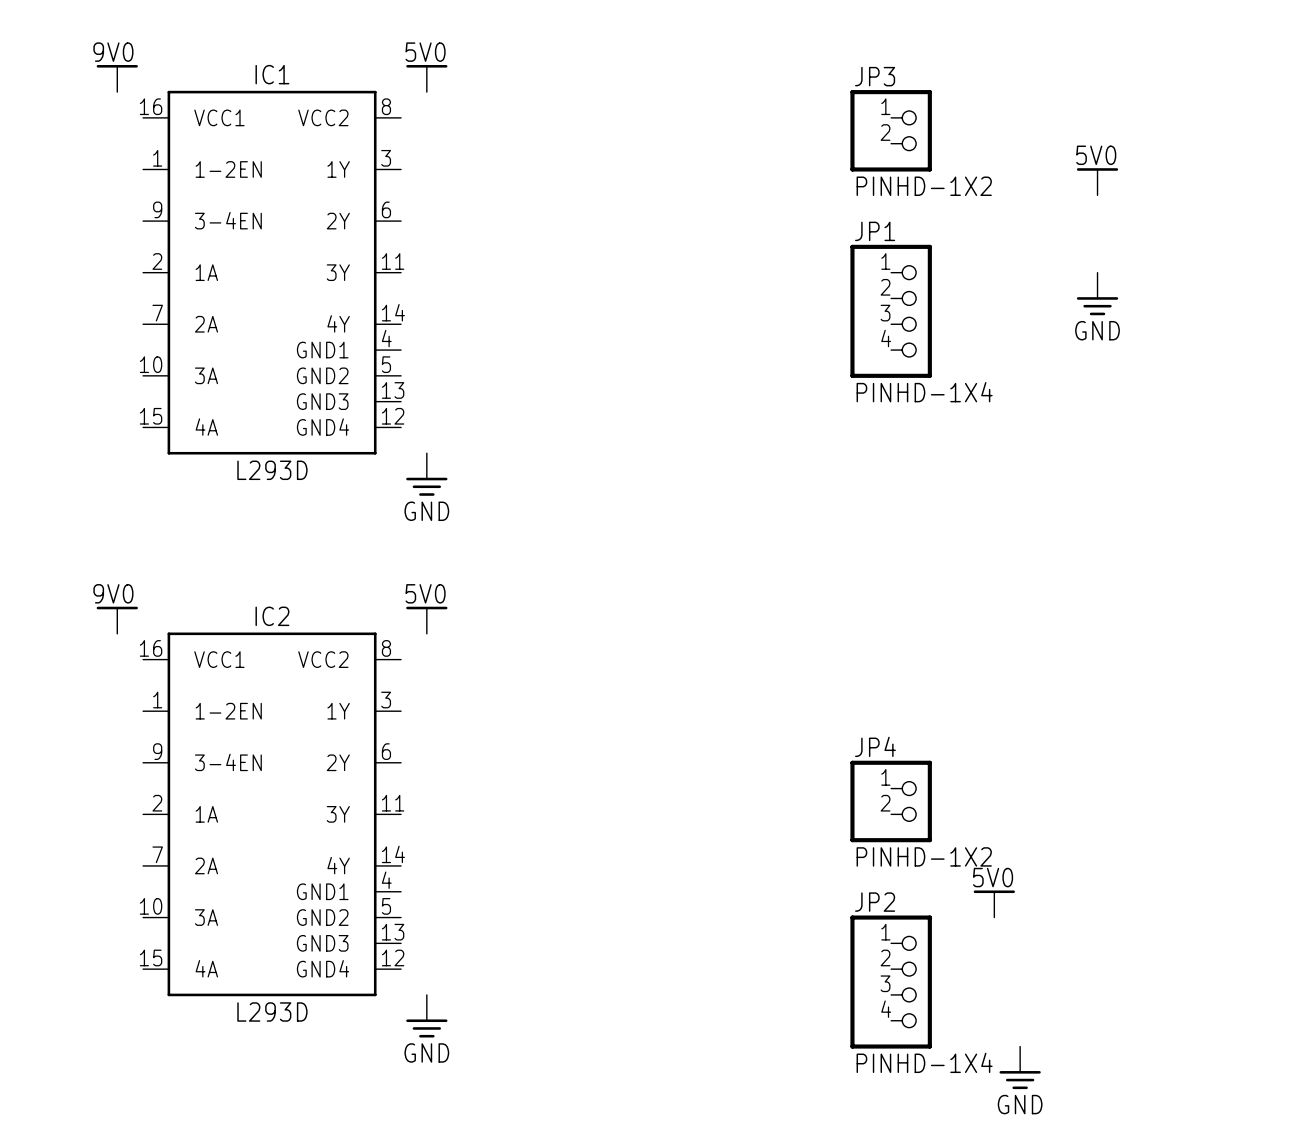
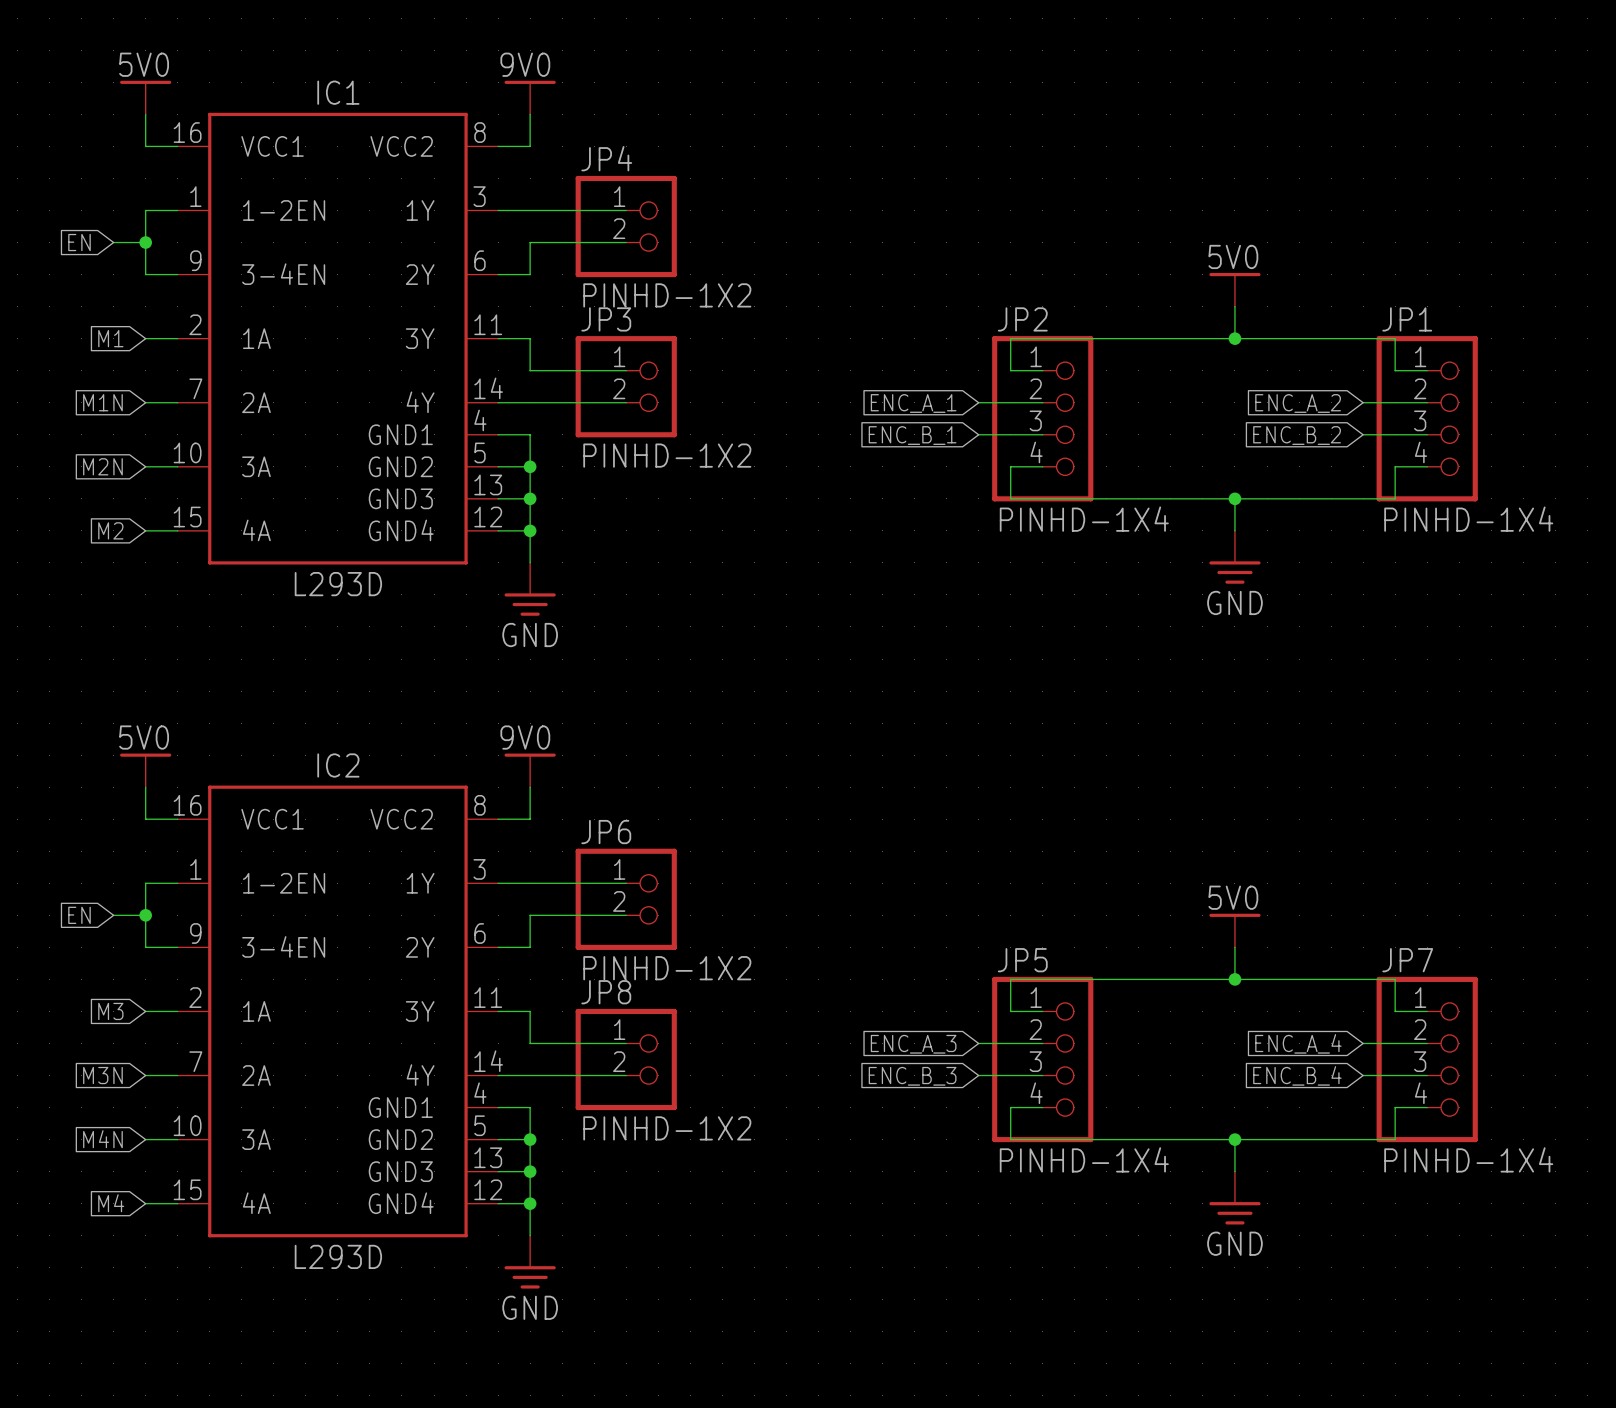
power symbol: 9V0 (117, 78) -> 5V0 (145, 97)
power symbol: 5V0 (426, 78) -> 9V0 (530, 97)
wire: none -> (145, 114) (145, 146) (177, 146)
wire: none -> (530, 114) (530, 146) (498, 146)
JP3 position: (891, 130) -> (626, 386)
wire: none -> (177, 210) (145, 210) (145, 274) (177, 274)
wire: none -> (498, 210) (626, 210)
power symbol position: 5V0 (1097, 181) -> 5V0 (1234, 289)
global label: none -> EN (79, 242)
wire: none -> (113, 242) (145, 242)
junction: none -> (145, 242)
wire: none -> (626, 242) (530, 242) (530, 274) (498, 274)
wire: none -> (1234, 306) (1234, 338)
global label: none -> M1 (110, 338)
wire: none -> (145, 338) (177, 338)
wire: none -> (498, 338) (530, 338) (530, 370) (626, 370)
junction: none -> (1234, 338)
power symbol position: GND (1097, 293) -> GND (1234, 557)
wire: none -> (1042, 370) (1010, 370) (1010, 338) (1395, 338) (1395, 370) (1427, 370)
JP1 position: (891, 311) -> (1427, 418)
global label: none -> M1N (102, 402)
wire: none -> (145, 402) (177, 402)
wire: none -> (498, 402) (626, 402)
global label: none -> ENC_A_1 (913, 403)
wire: none -> (978, 402) (1042, 402)
global label: none -> ENC_A_2 (1298, 403)
wire: none -> (1363, 402) (1427, 402)
wire: none -> (498, 434) (530, 434) (530, 562)
global label: none -> ENC_B_1 (912, 435)
wire: none -> (978, 434) (1042, 434)
global label: none -> ENC_B_2 (1297, 435)
wire: none -> (1363, 434) (1427, 434)
global label: none -> M2N (102, 466)
wire: none -> (145, 466) (177, 466)
wire: none -> (498, 466) (530, 466)
junction: none -> (530, 466)
wire: none -> (1042, 466) (1010, 466) (1010, 498) (1395, 498) (1395, 466) (1427, 466)
wire: none -> (498, 498) (530, 498)
junction: none -> (530, 498)
wire: none -> (1234, 498) (1234, 530)
junction: none -> (1234, 498)
global label: none -> M2 (110, 530)
wire: none -> (145, 530) (177, 530)
wire: none -> (498, 530) (530, 530)
junction: none -> (530, 530)
power symbol: 9V0 (117, 620) -> 5V0 (145, 770)
power symbol: 5V0 (426, 620) -> 9V0 (530, 770)
wire: none -> (145, 787) (145, 819) (177, 819)
wire: none -> (530, 787) (530, 819) (498, 819)
wire: none -> (177, 883) (145, 883) (145, 947) (177, 947)
wire: none -> (498, 883) (626, 883)
JP6: none -> PINHD-1X2 (626, 899)
global label: none -> EN (79, 915)
wire: none -> (113, 915) (145, 915)
junction: none -> (145, 915)
wire: none -> (626, 915) (530, 915) (530, 947) (498, 947)
wire: none -> (1234, 947) (1234, 979)
junction: none -> (1234, 979)
JP4 position: (891, 801) -> (626, 226)
global label: none -> M3 (110, 1011)
wire: none -> (145, 1011) (177, 1011)
wire: none -> (498, 1011) (530, 1011) (530, 1043) (626, 1043)
wire: none -> (1042, 1011) (1010, 1011) (1010, 979) (1395, 979) (1395, 1011) (1427, 1011)
global label: none -> ENC_A_3 (913, 1044)
wire: none -> (978, 1043) (1042, 1043)
global label: none -> ENC_A_4 (1298, 1043)
wire: none -> (1363, 1043) (1427, 1043)
JP8: none -> PINHD-1X2 (626, 1059)
JP5: none -> PINHD-1X4 (1042, 1059)
JP7: none -> PINHD-1X4 (1427, 1059)
global label: none -> M3N (102, 1075)
wire: none -> (145, 1075) (177, 1075)
wire: none -> (498, 1075) (626, 1075)
wire: none -> (978, 1075) (1042, 1075)
wire: none -> (1363, 1075) (1427, 1075)
global label: none -> ENC_B_3 (912, 1076)
global label: none -> ENC_B_4 (1297, 1075)
wire: none -> (498, 1107) (530, 1107) (530, 1235)
wire: none -> (1042, 1107) (1010, 1107) (1010, 1139) (1395, 1139) (1395, 1107) (1427, 1107)
power symbol position: 5V0 (994, 904) -> 5V0 (1234, 930)
global label: none -> M4N (102, 1139)
wire: none -> (145, 1139) (177, 1139)
wire: none -> (498, 1139) (530, 1139)
junction: none -> (530, 1139)
wire: none -> (1234, 1139) (1234, 1171)
junction: none -> (1234, 1139)
wire: none -> (498, 1171) (530, 1171)
junction: none -> (530, 1171)
global label: none -> M4 (111, 1203)
wire: none -> (145, 1203) (177, 1203)
wire: none -> (498, 1203) (530, 1203)
junction: none -> (530, 1203)
JP2 position: (891, 982) -> (1042, 418)
power symbol position: GND (1020, 1067) -> GND (1234, 1198)

